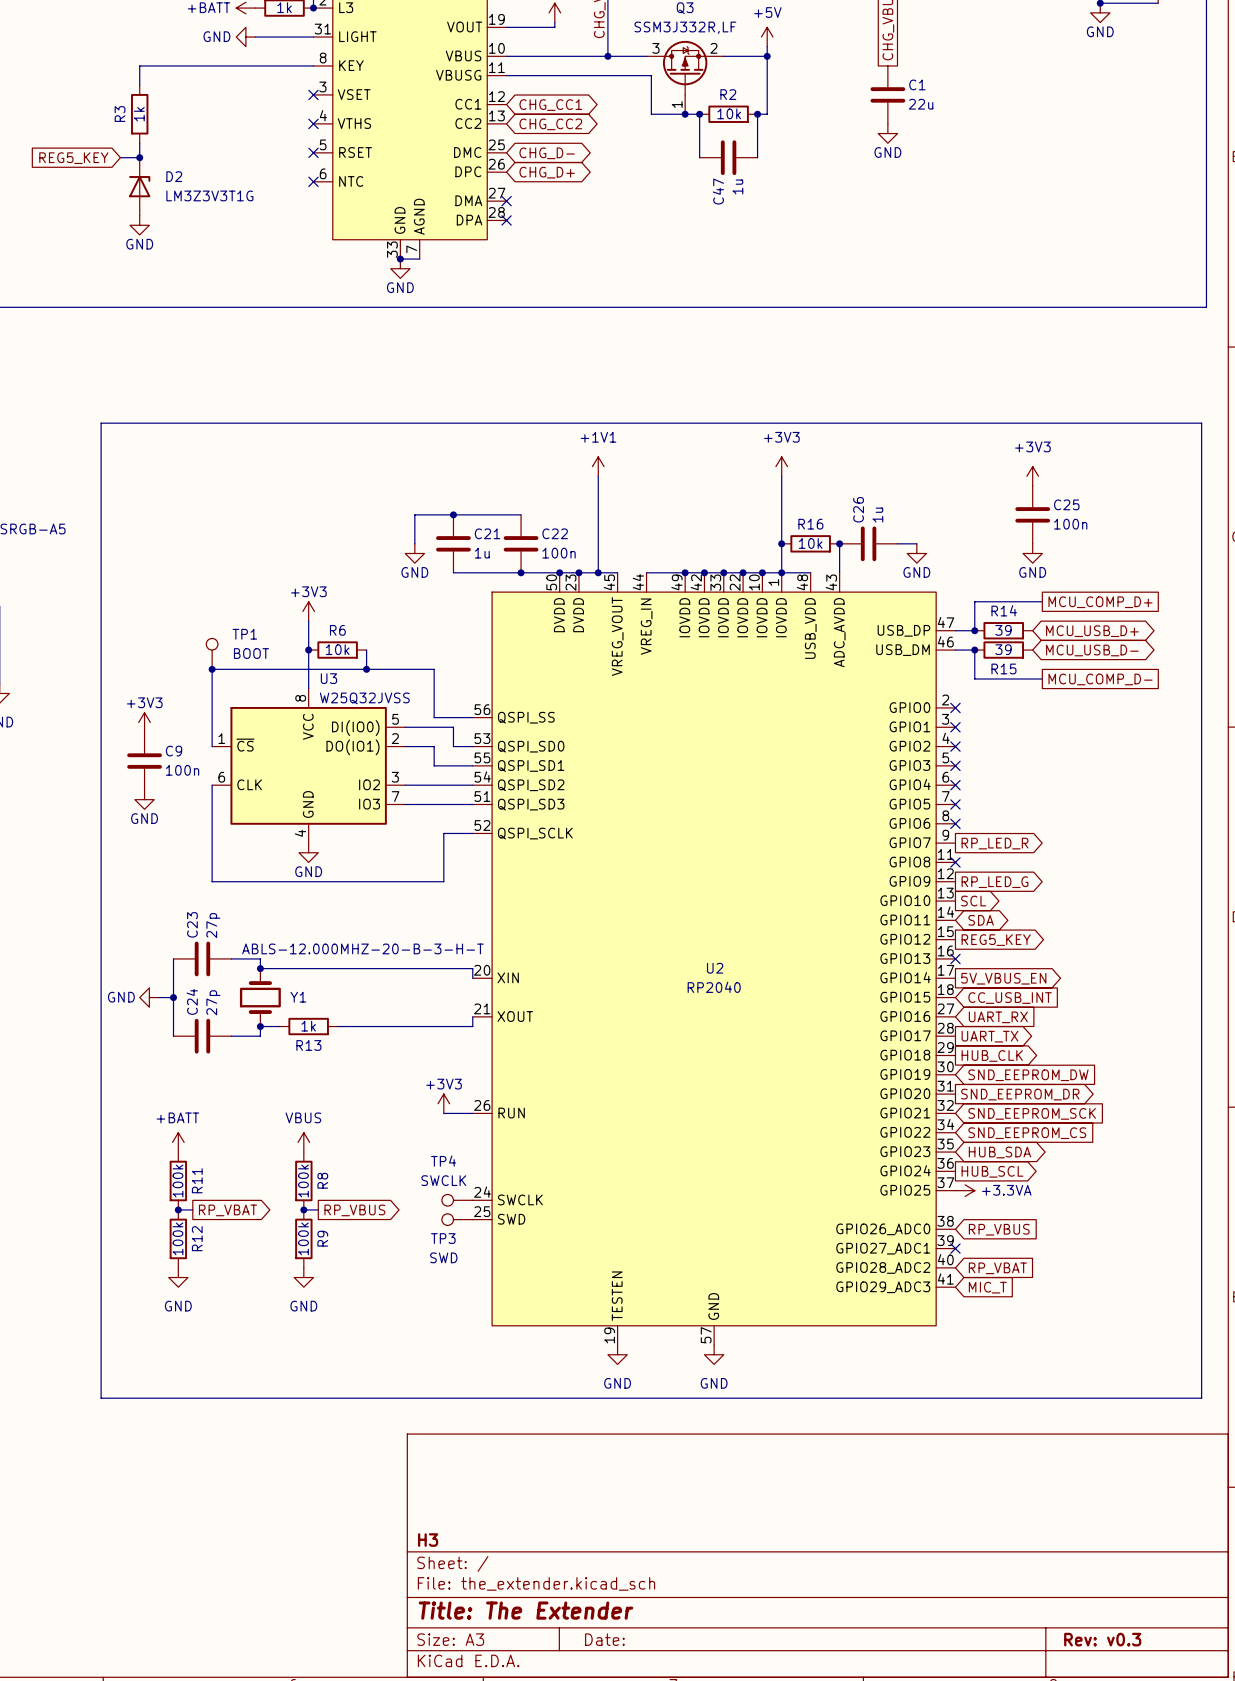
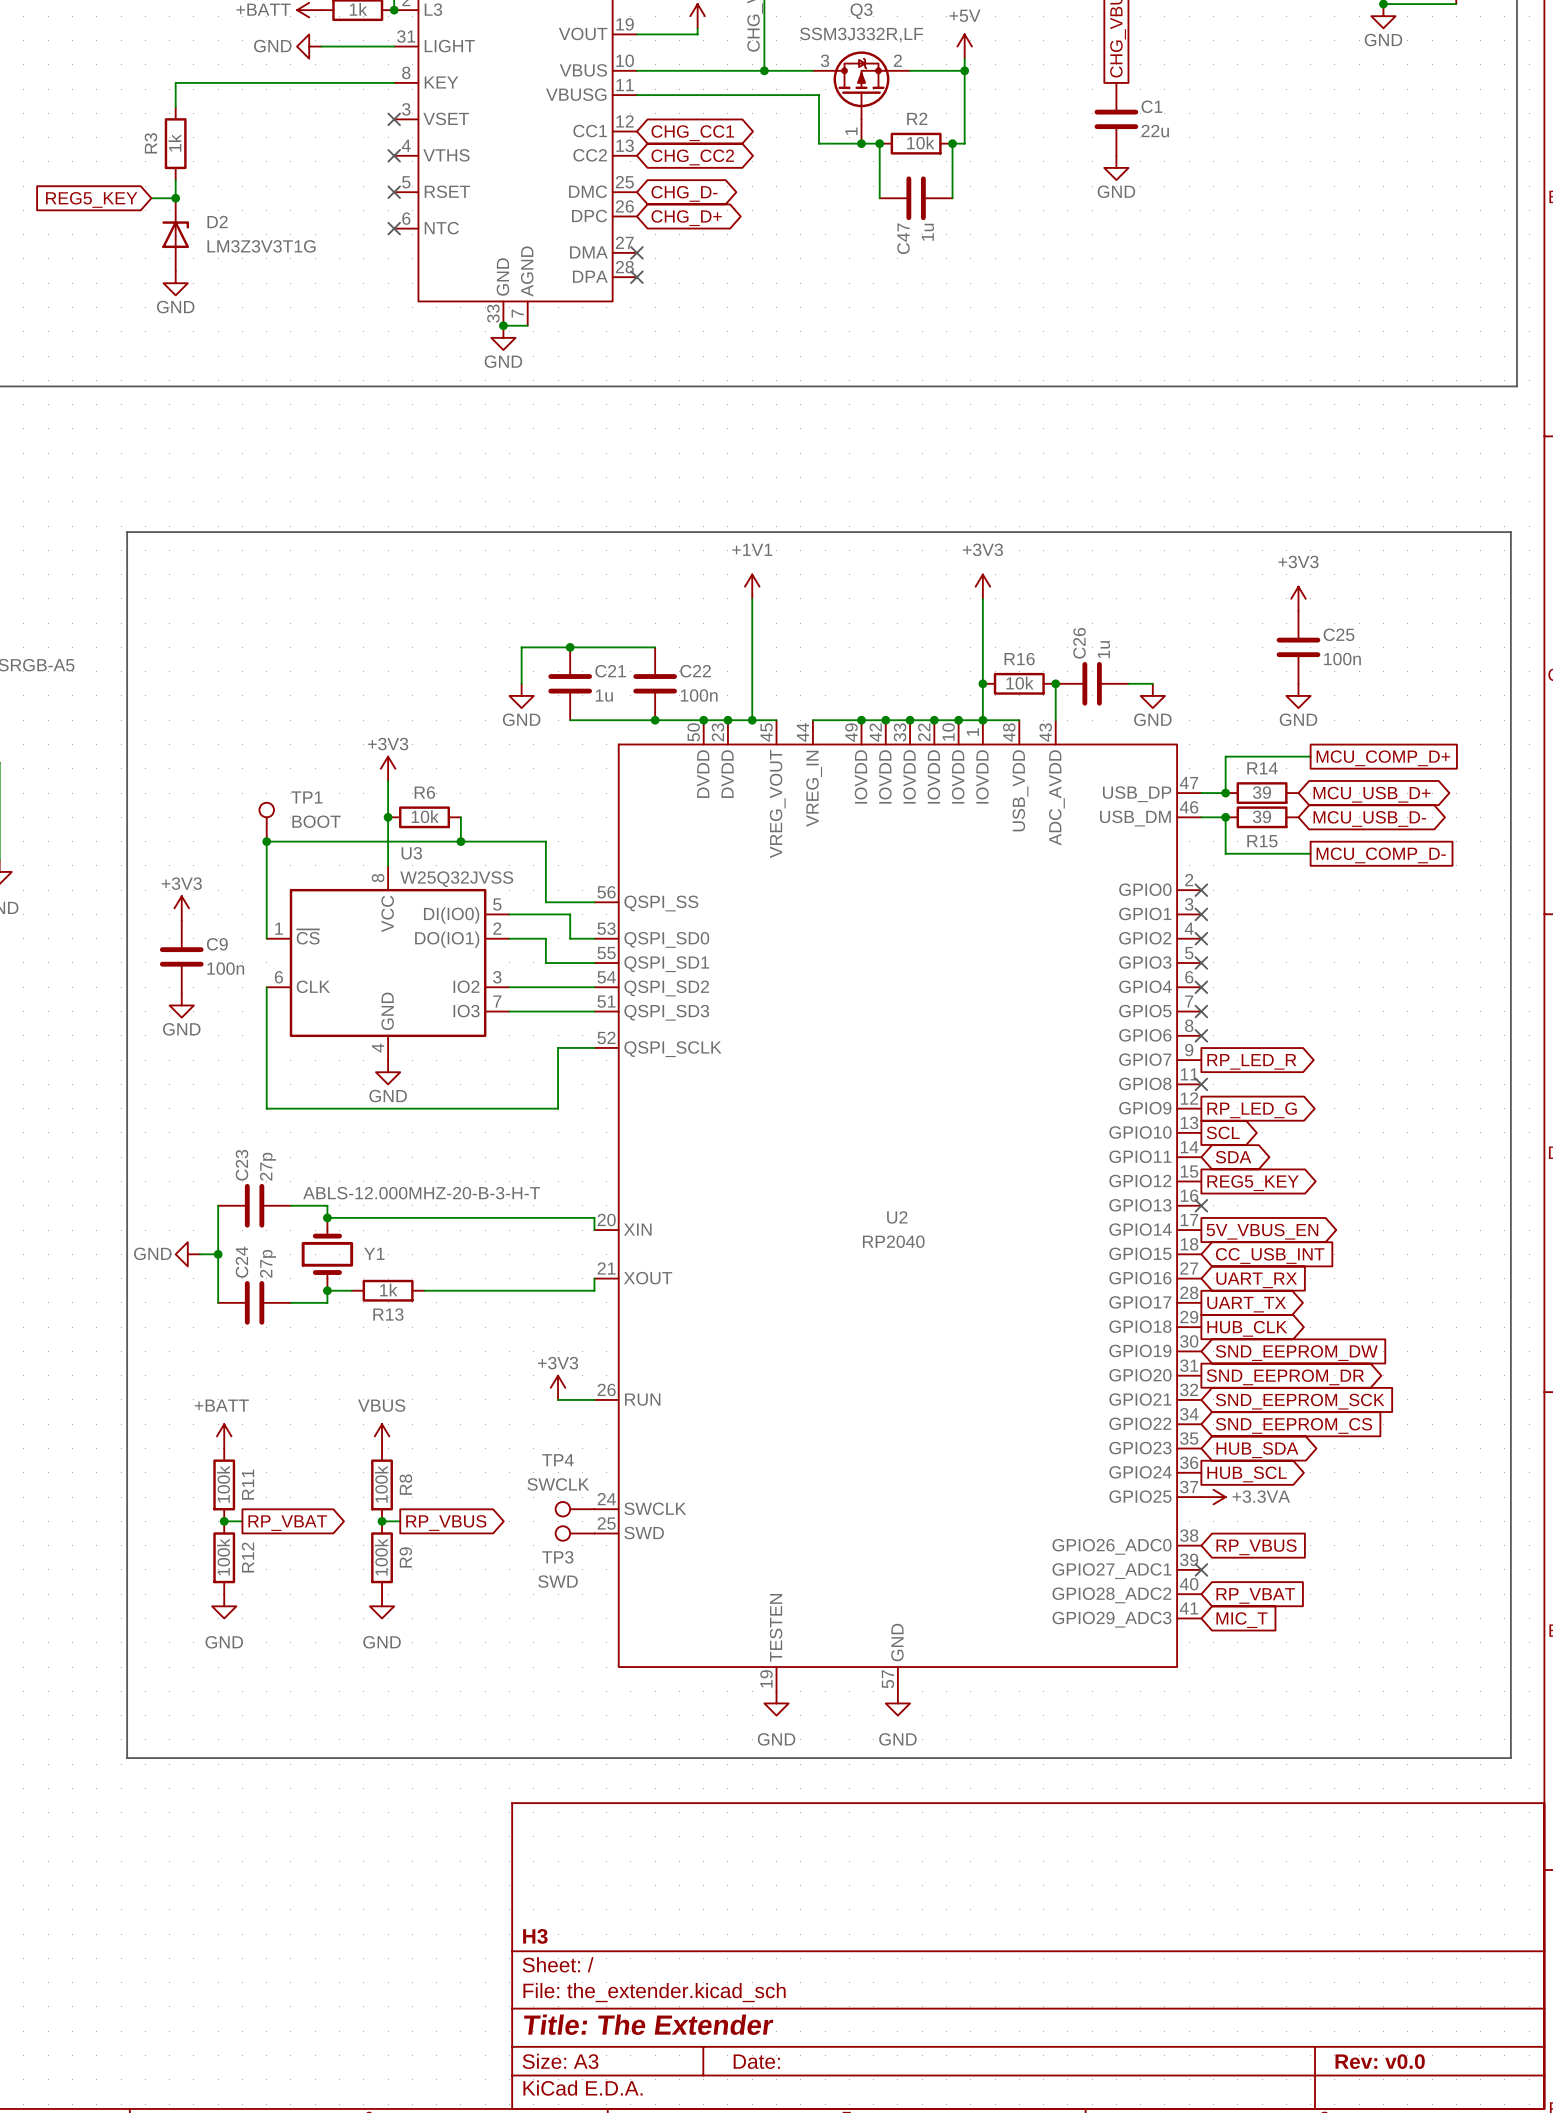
title block: Rev: v0.3 (1102, 1639) -> Rev: v0.0 (1380, 2061)

